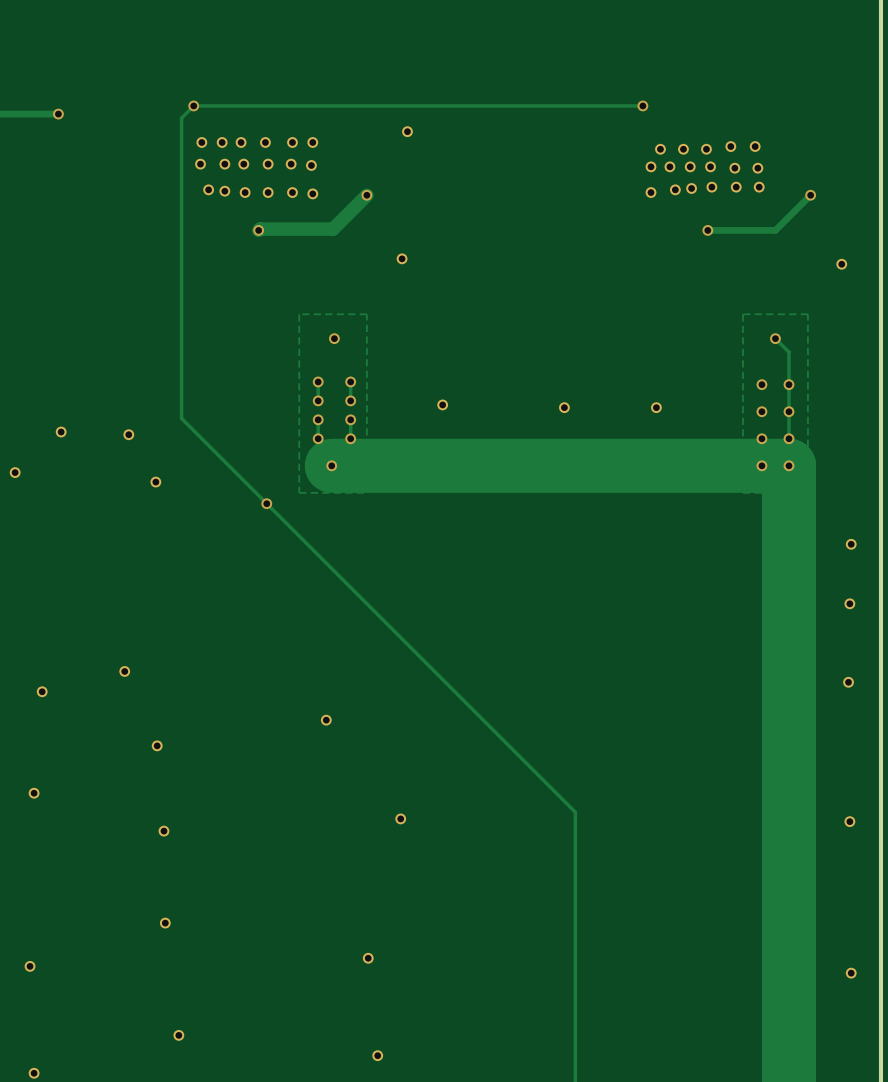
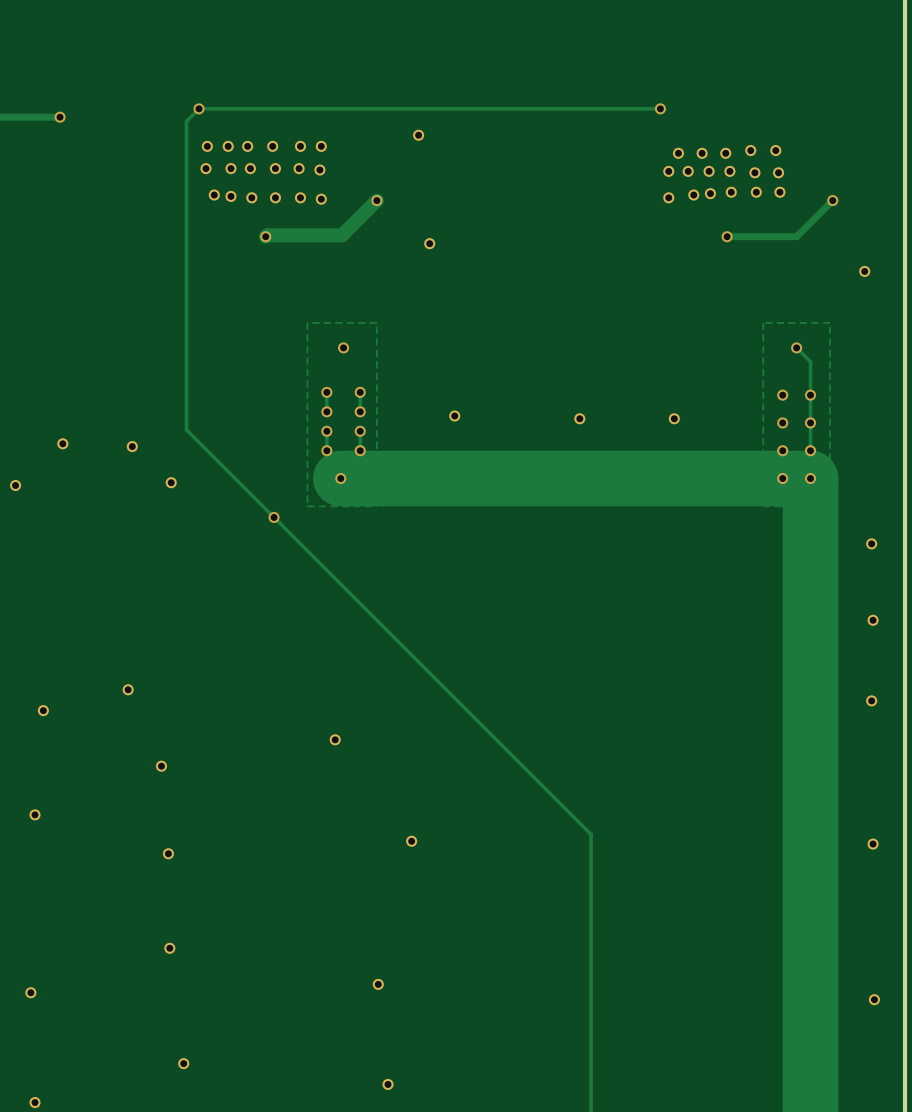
part position: (402, 258) -> (429, 243)
part position: (155, 482) -> (171, 482)
part position: (851, 544) -> (871, 543)

